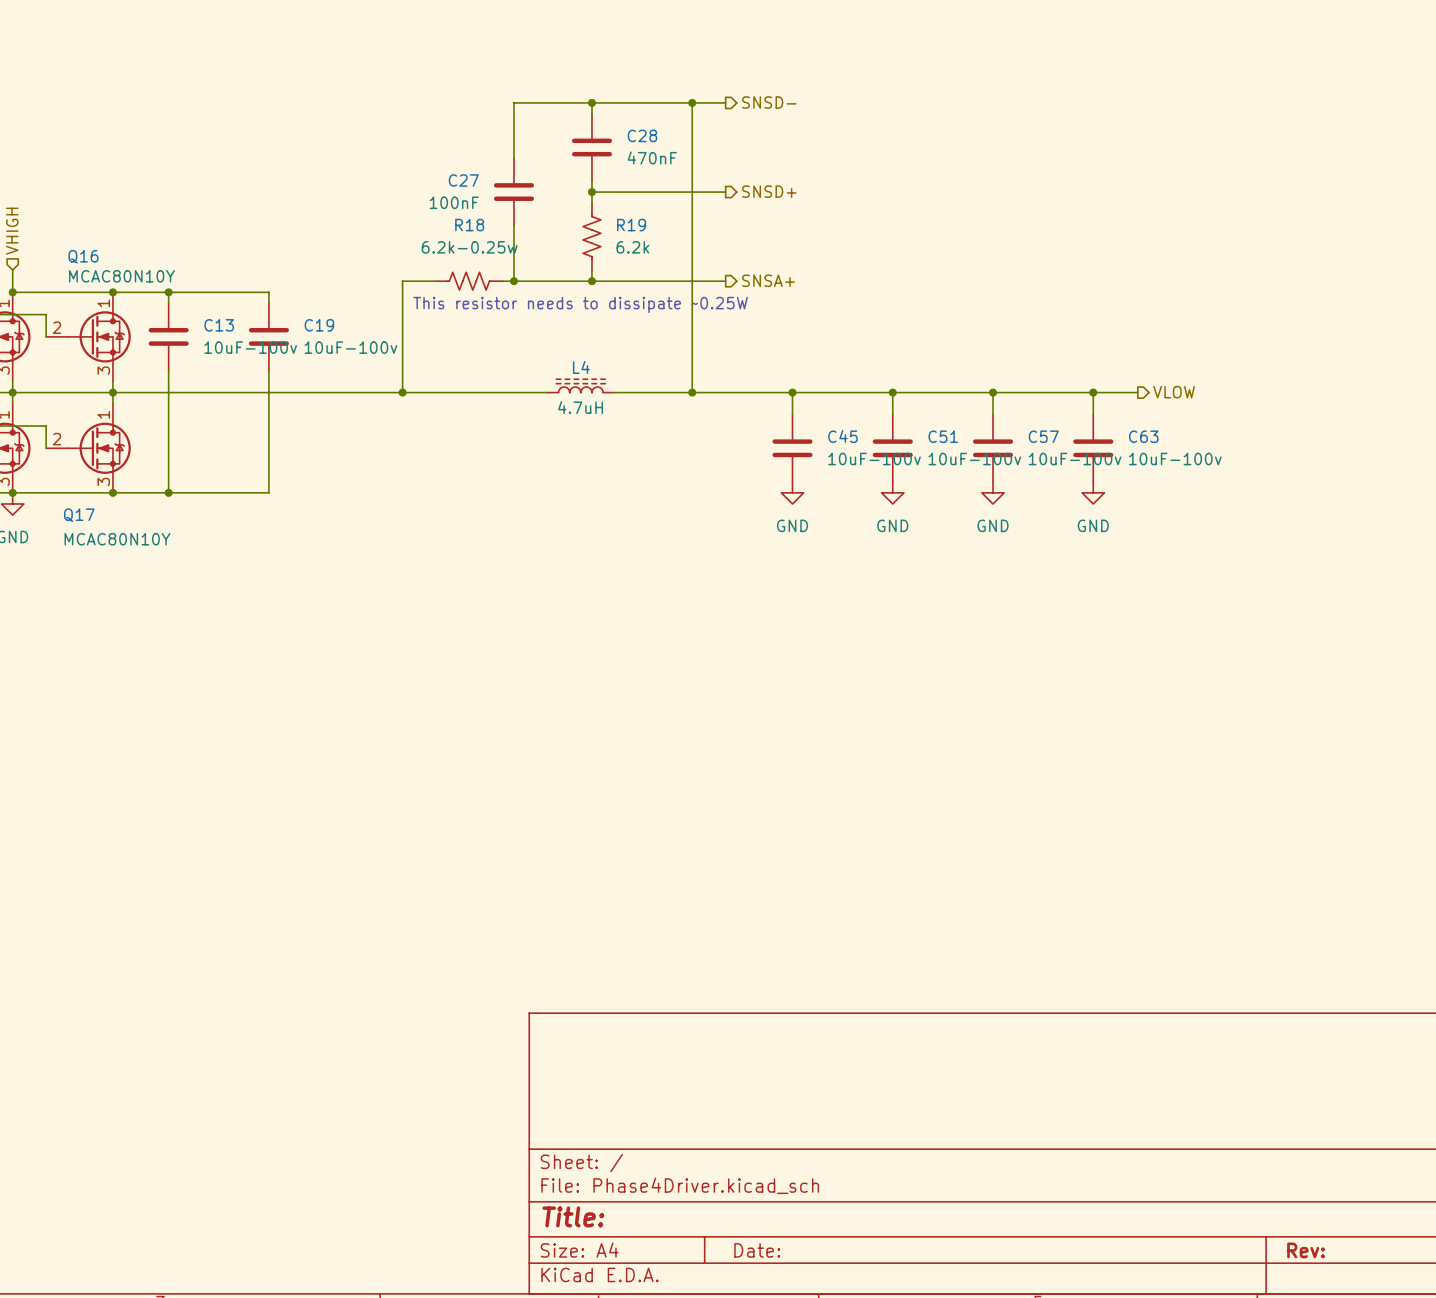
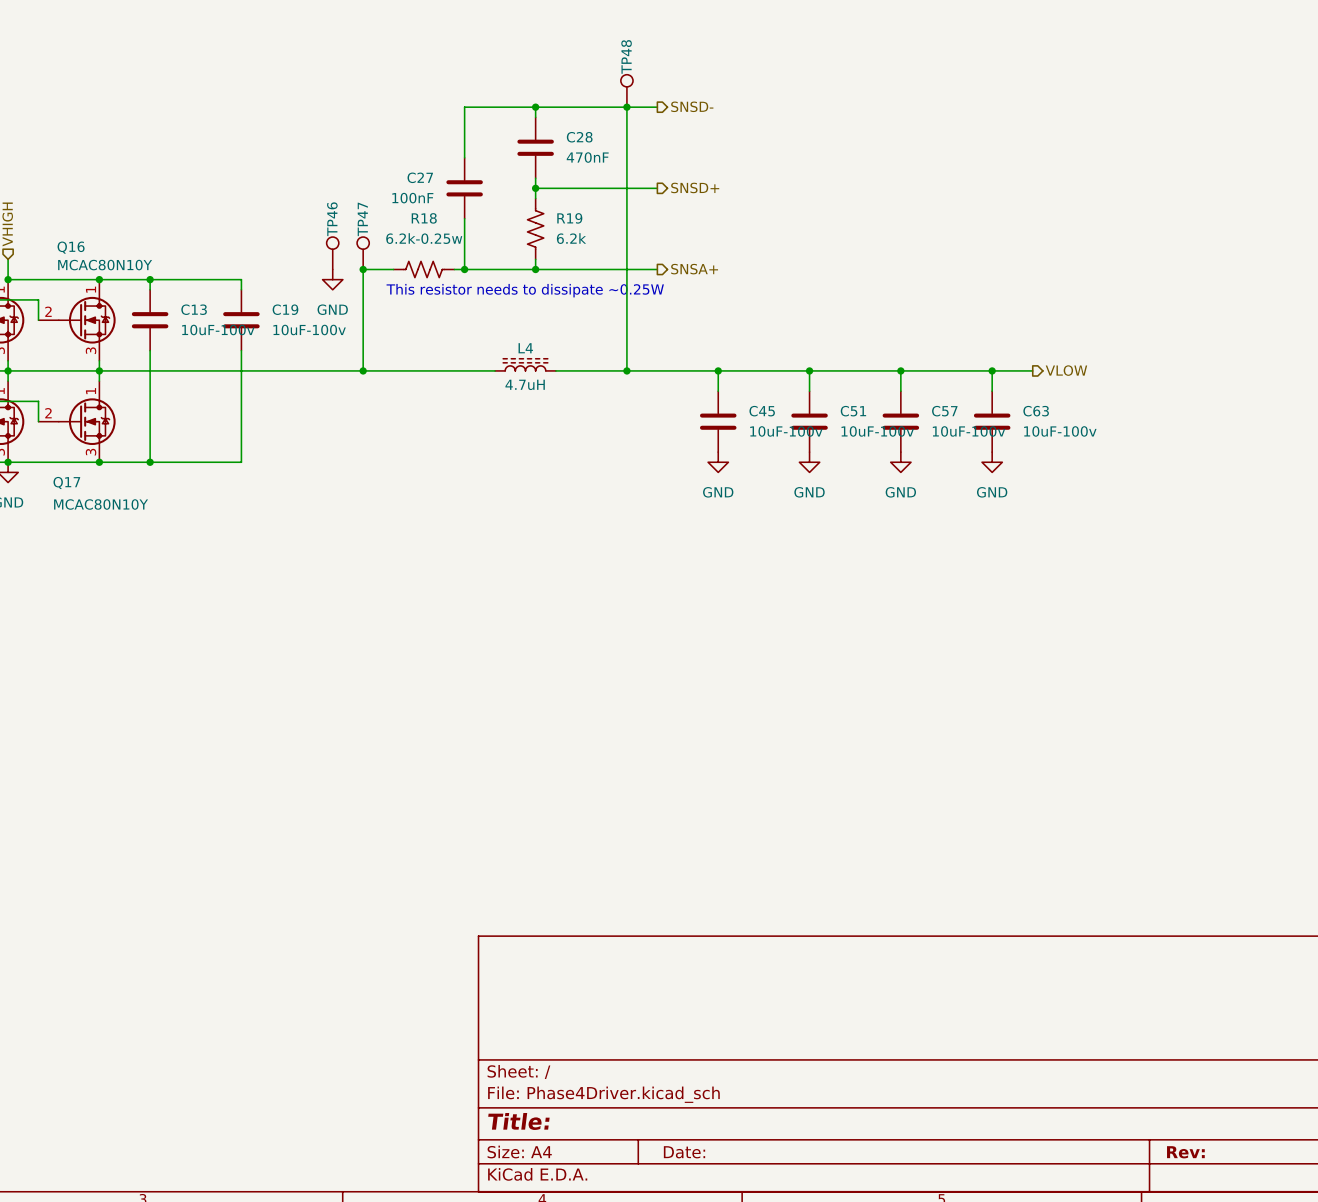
TP48: none -> (626, 90)
TP46: none -> (332, 253)
TP47: none -> (363, 253)
junction: none -> (363, 269)
power symbol: none -> GND (332, 279)

